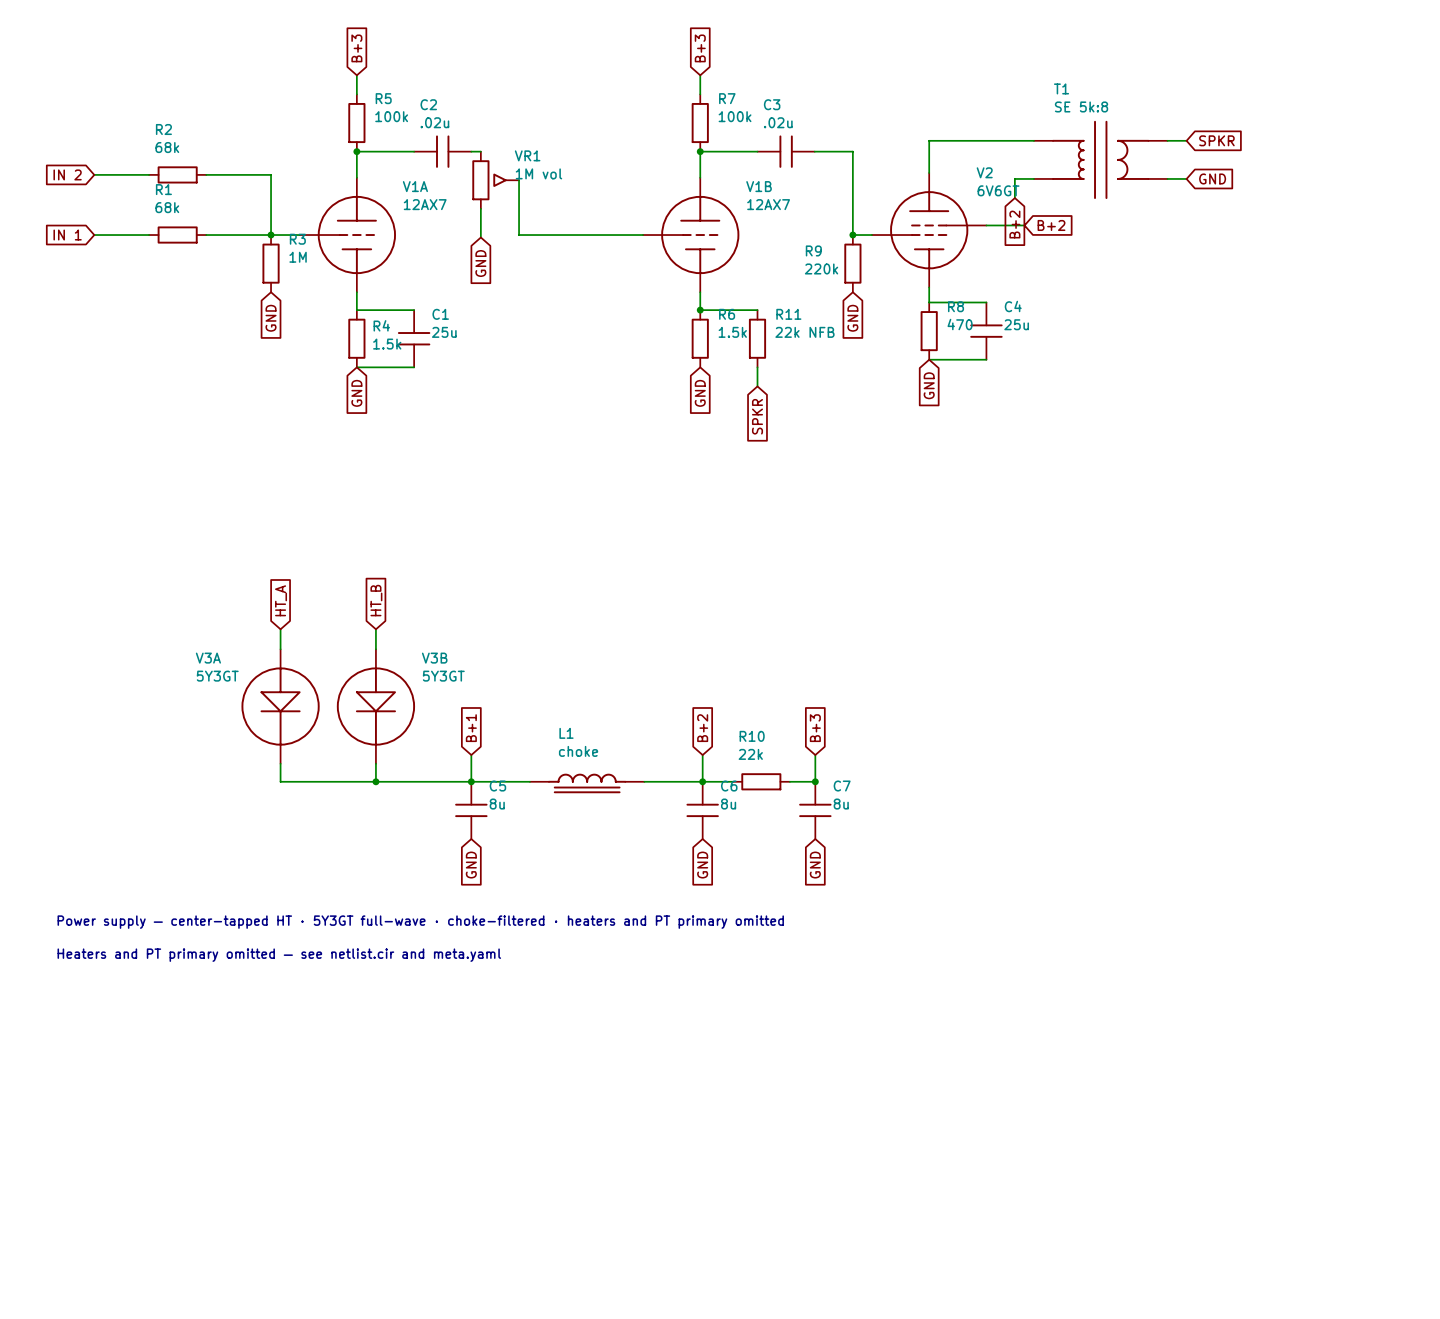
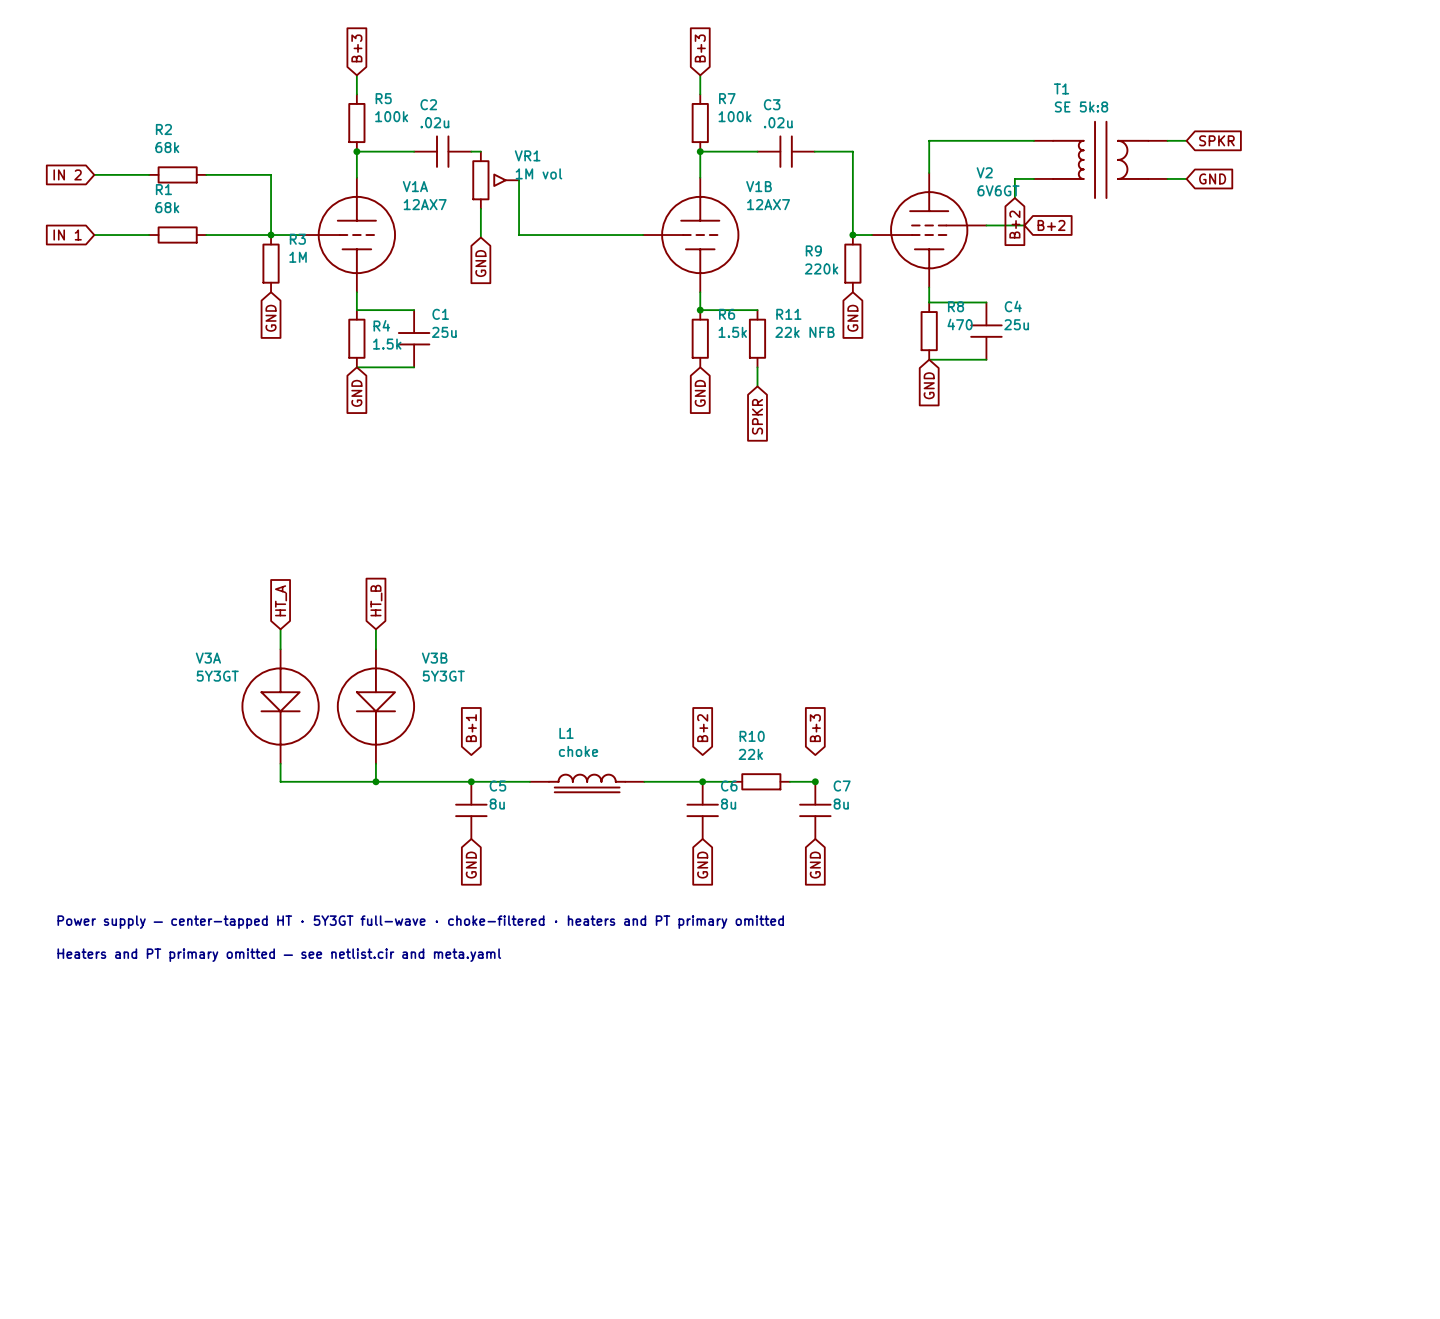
wire: (471, 755) (471, 781) -> none
wire: (702, 755) (702, 781) -> none
wire: (815, 755) (815, 781) -> none

